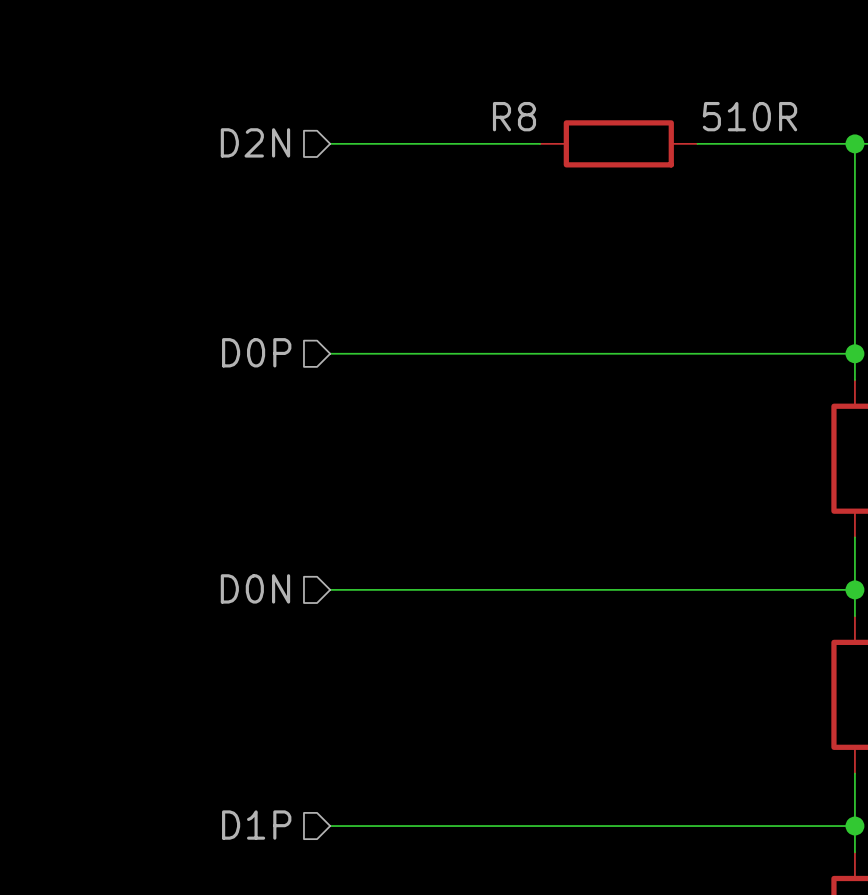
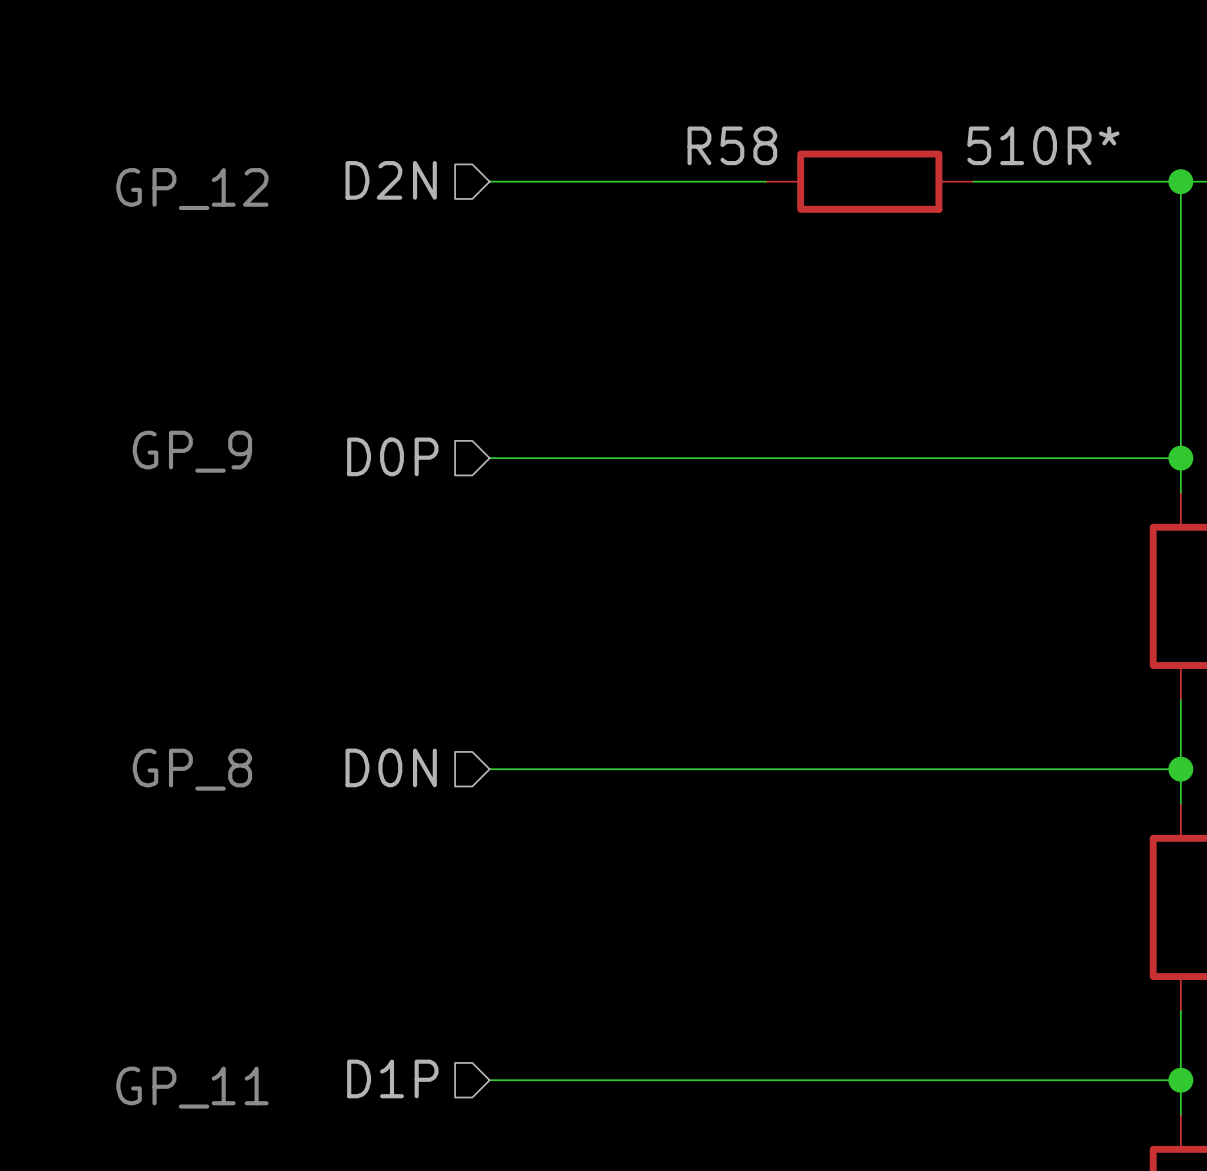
R8 name: R8 (514, 116) -> R58 (732, 145)
R8 value: 510R (749, 116) -> 510R* (1043, 145)
text: none -> GP_12 (192, 189)
text: none -> GP_9 (192, 451)
text: none -> GP_8 (192, 769)
text: none -> GP_11 (192, 1087)

